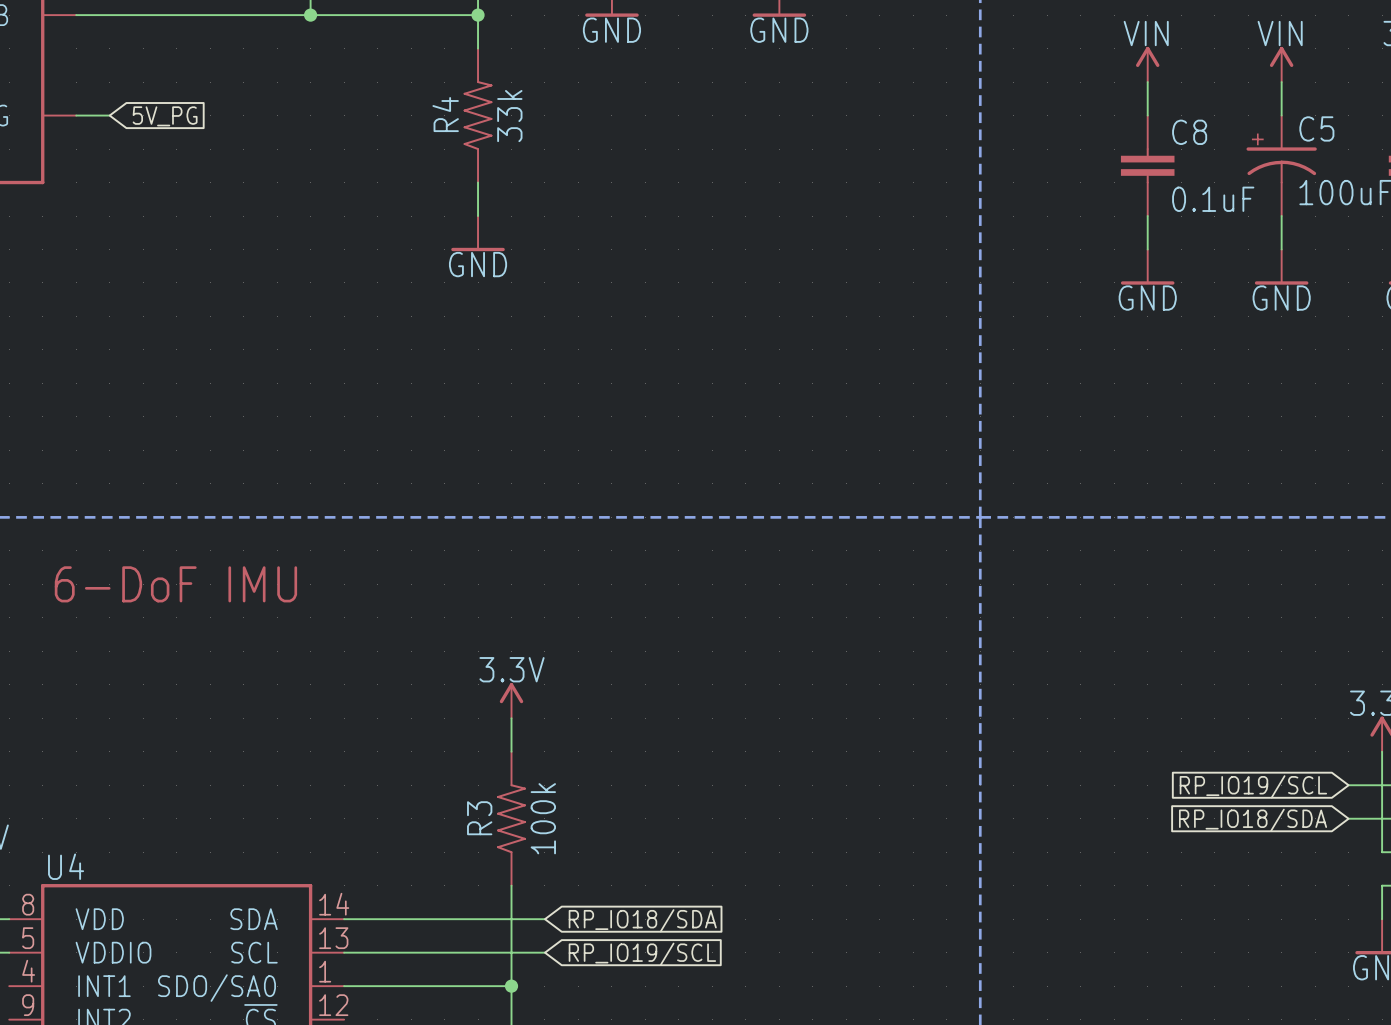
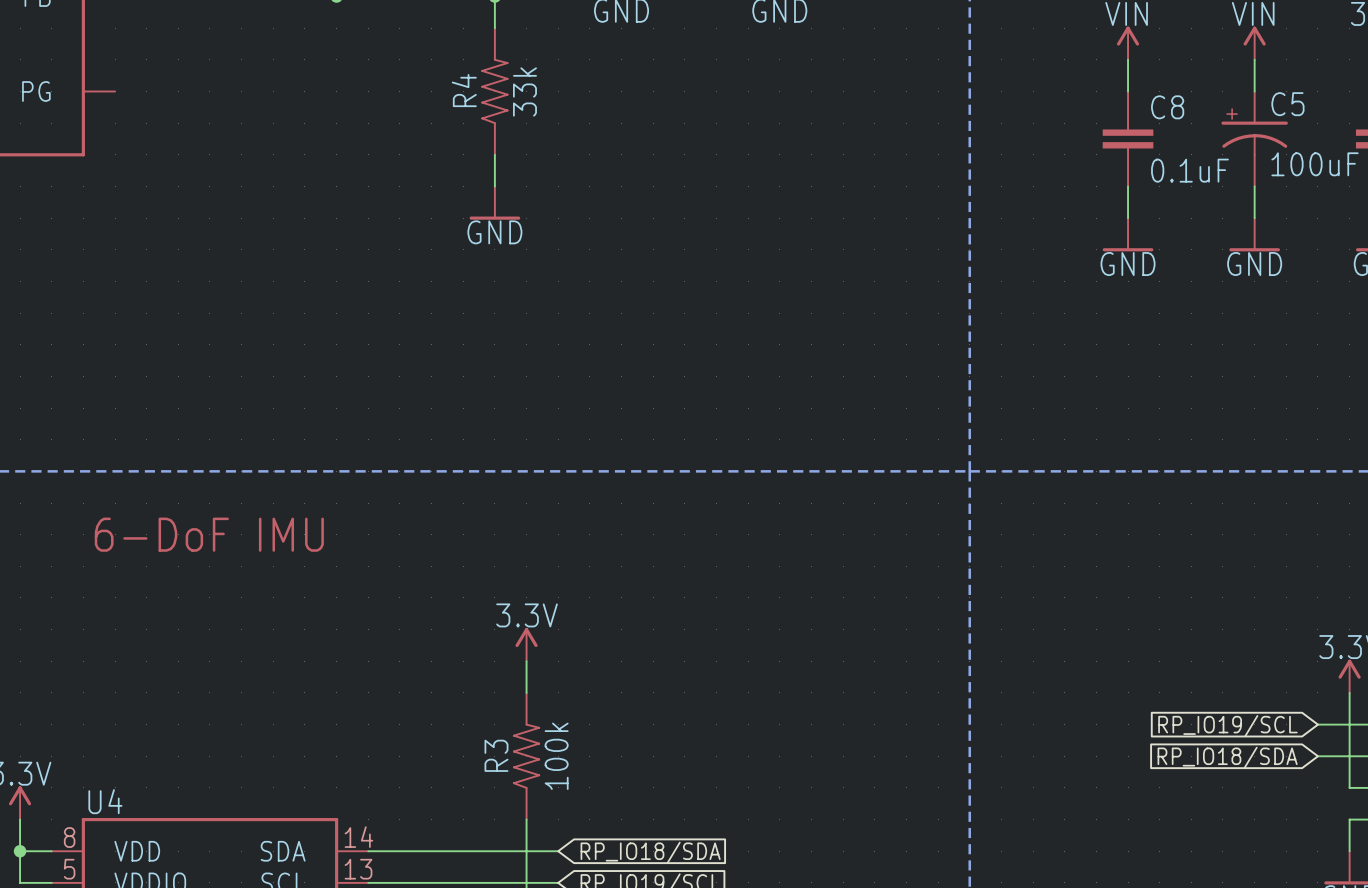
wire: (76, 115) (109, 115) -> none
global label: 5V_PG (165, 116) -> none

